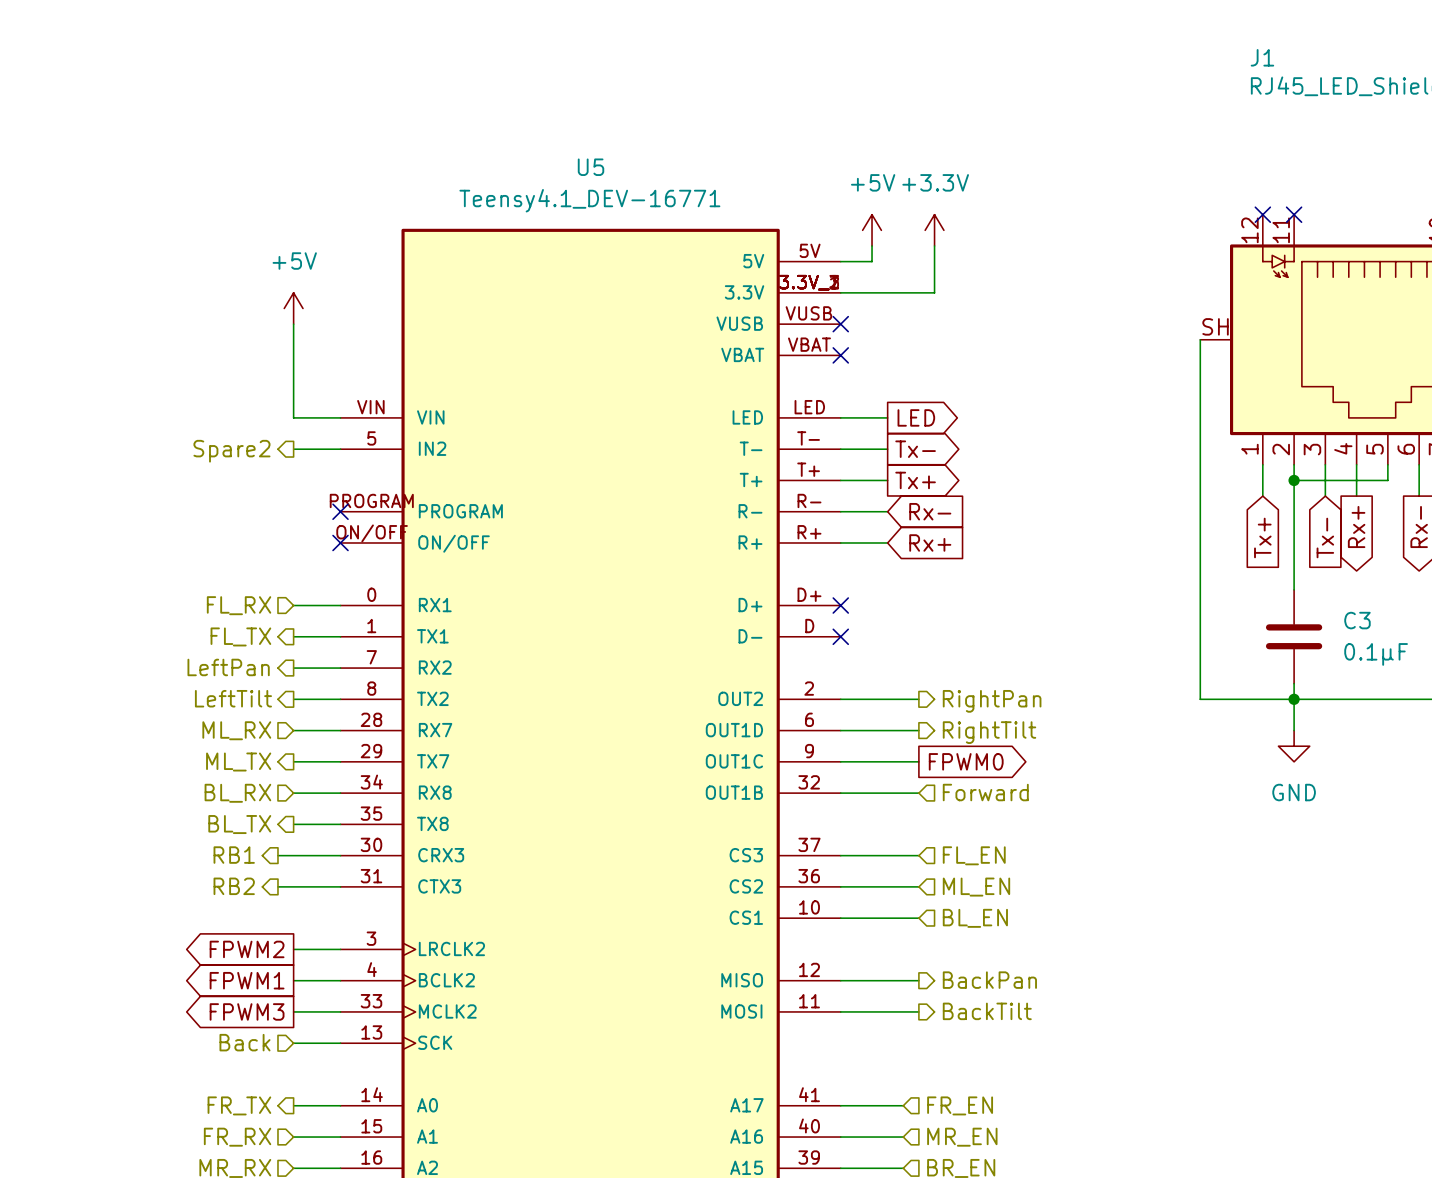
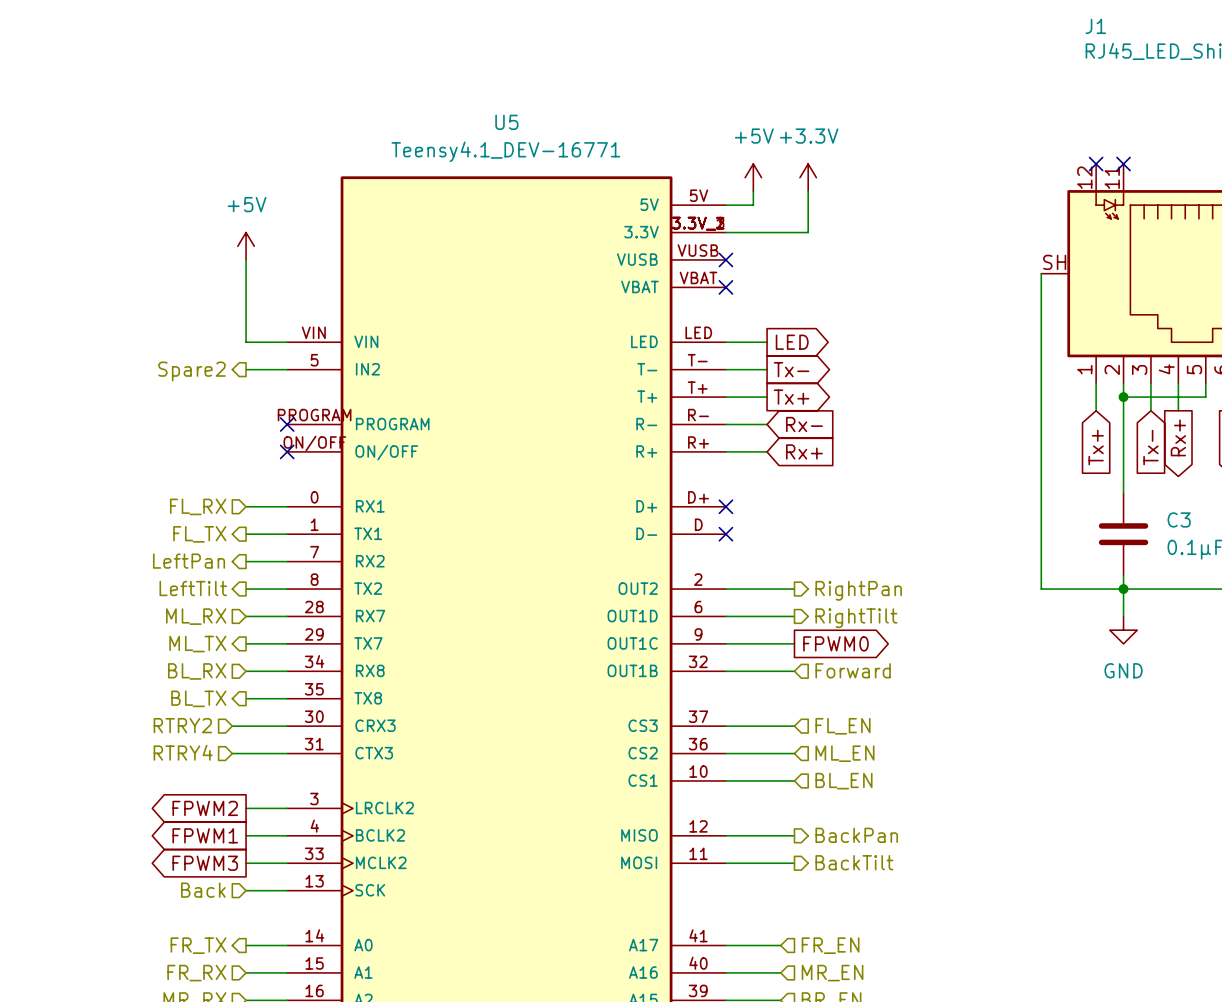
hierarchical label shape: output (234, 855) -> input (182, 725)
hierarchical label: RB1 (234, 855) -> RTRY2 (182, 725)
hierarchical label shape: output (234, 886) -> input (183, 752)
hierarchical label: RB2 (234, 886) -> RTRY4 (183, 752)

